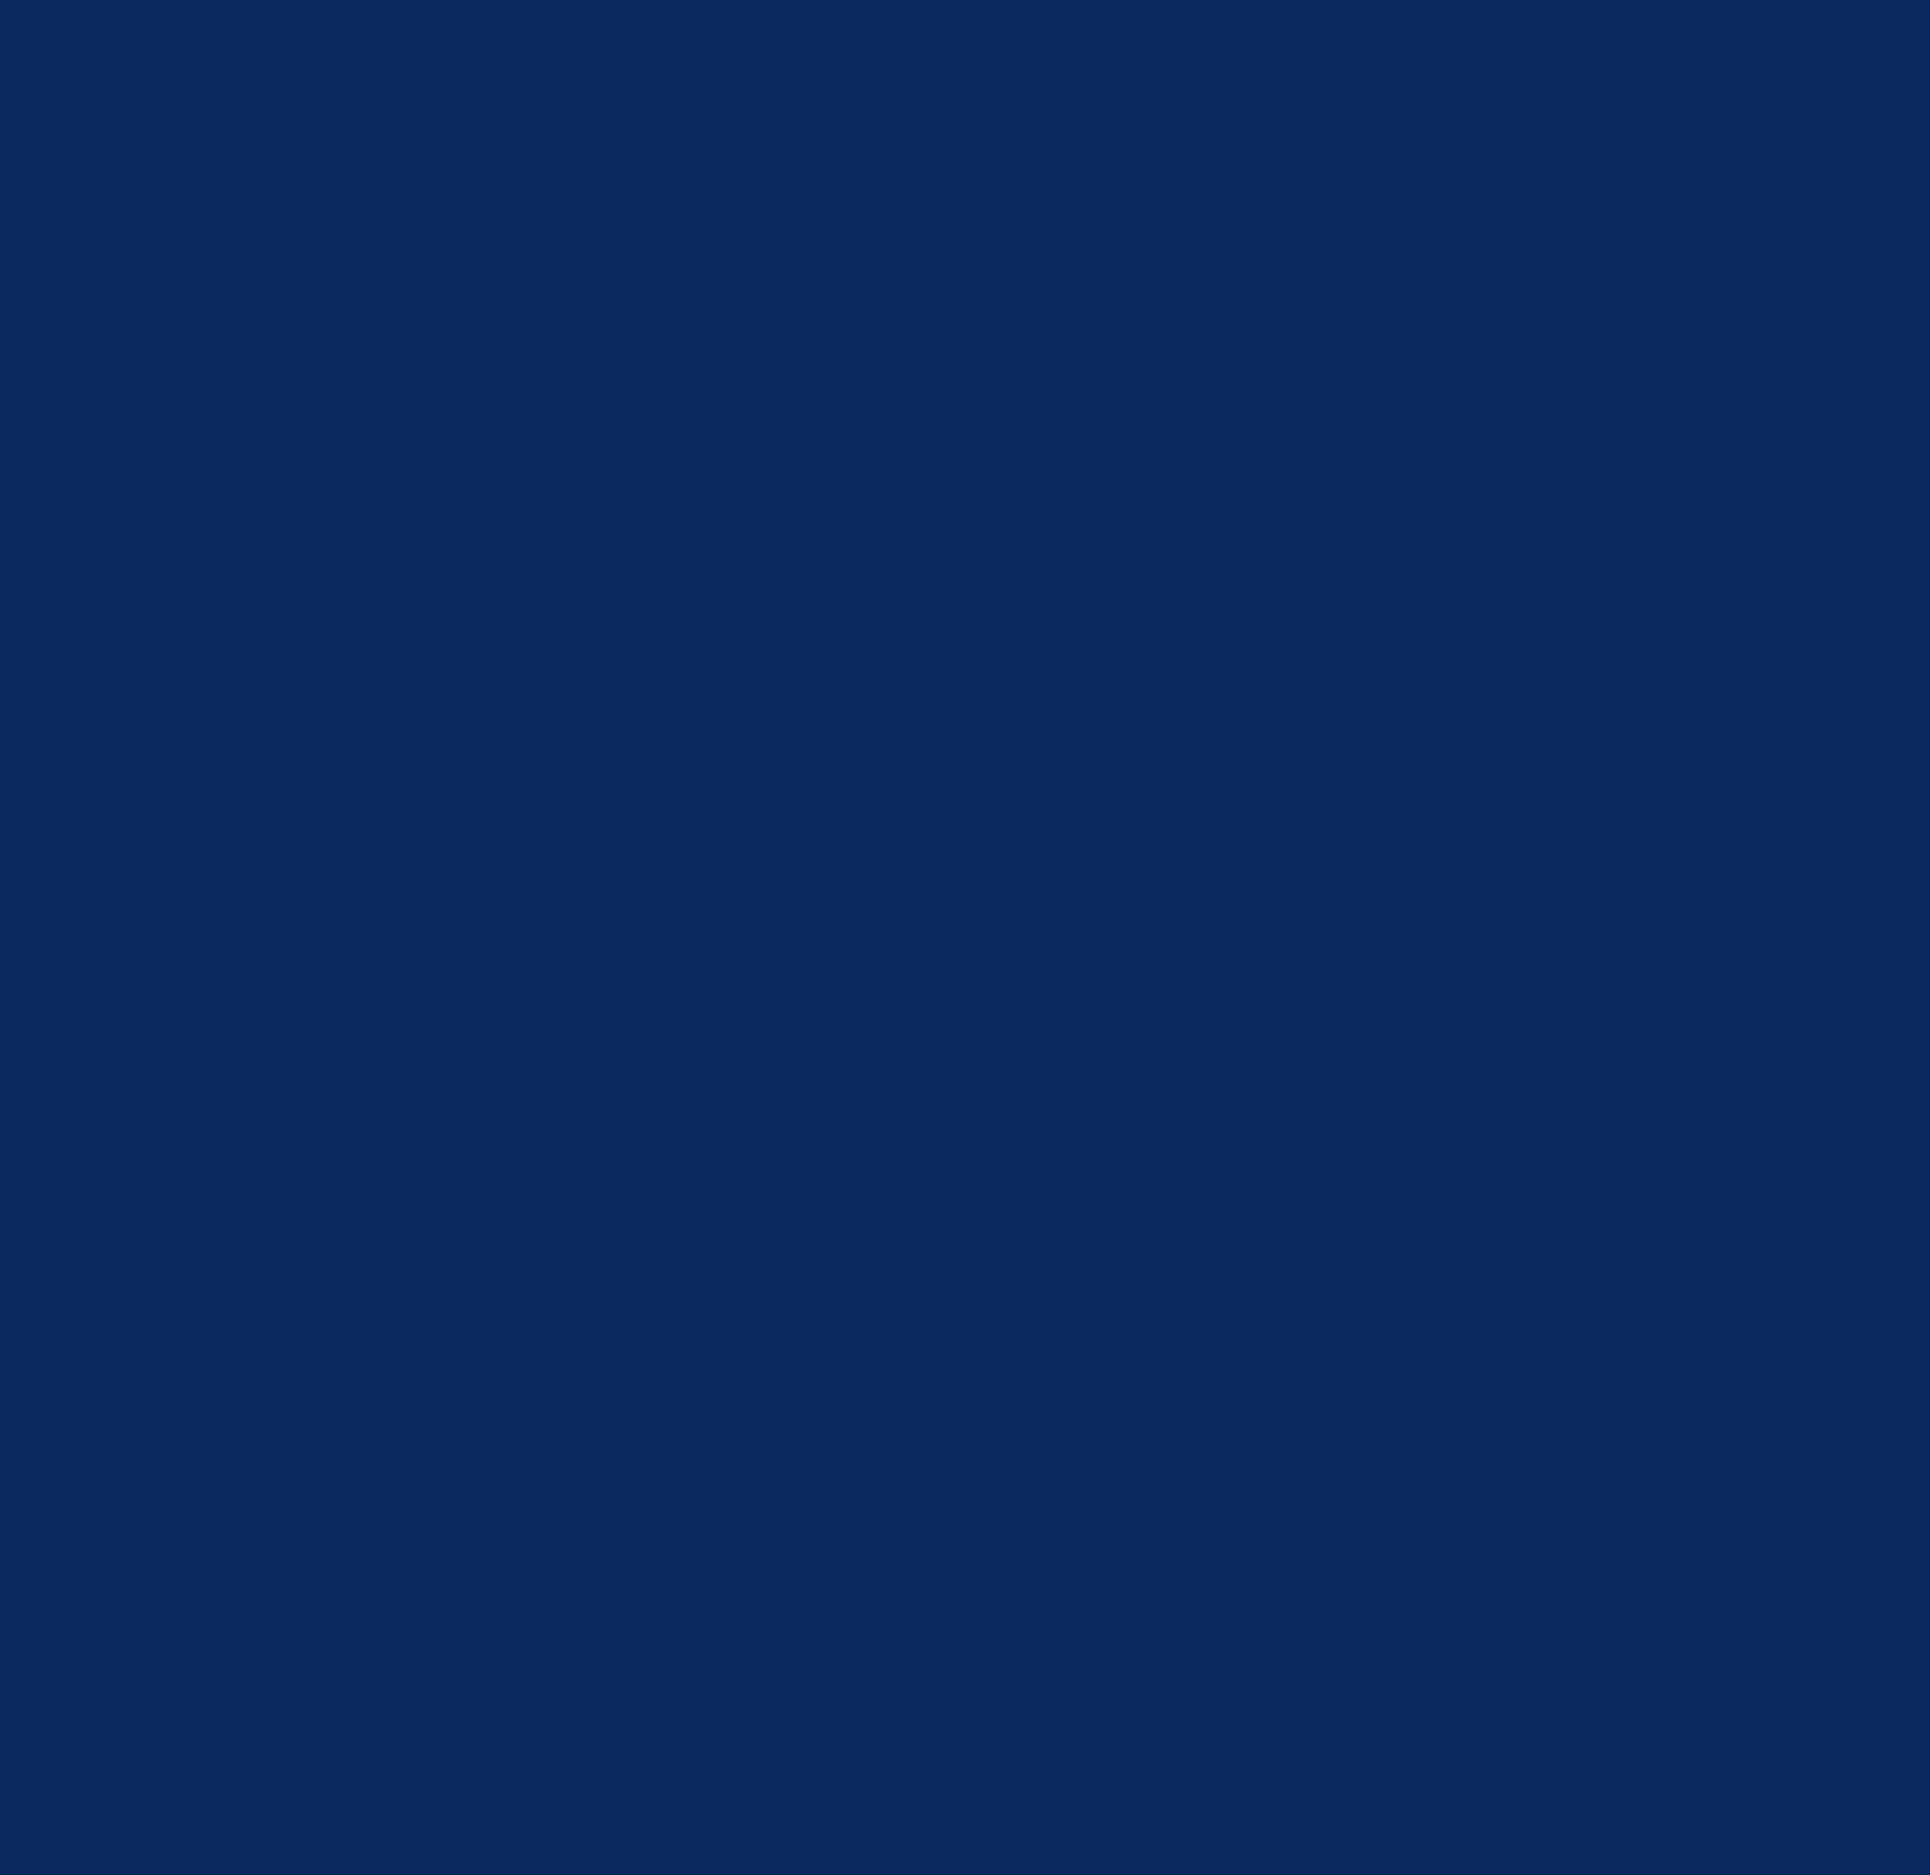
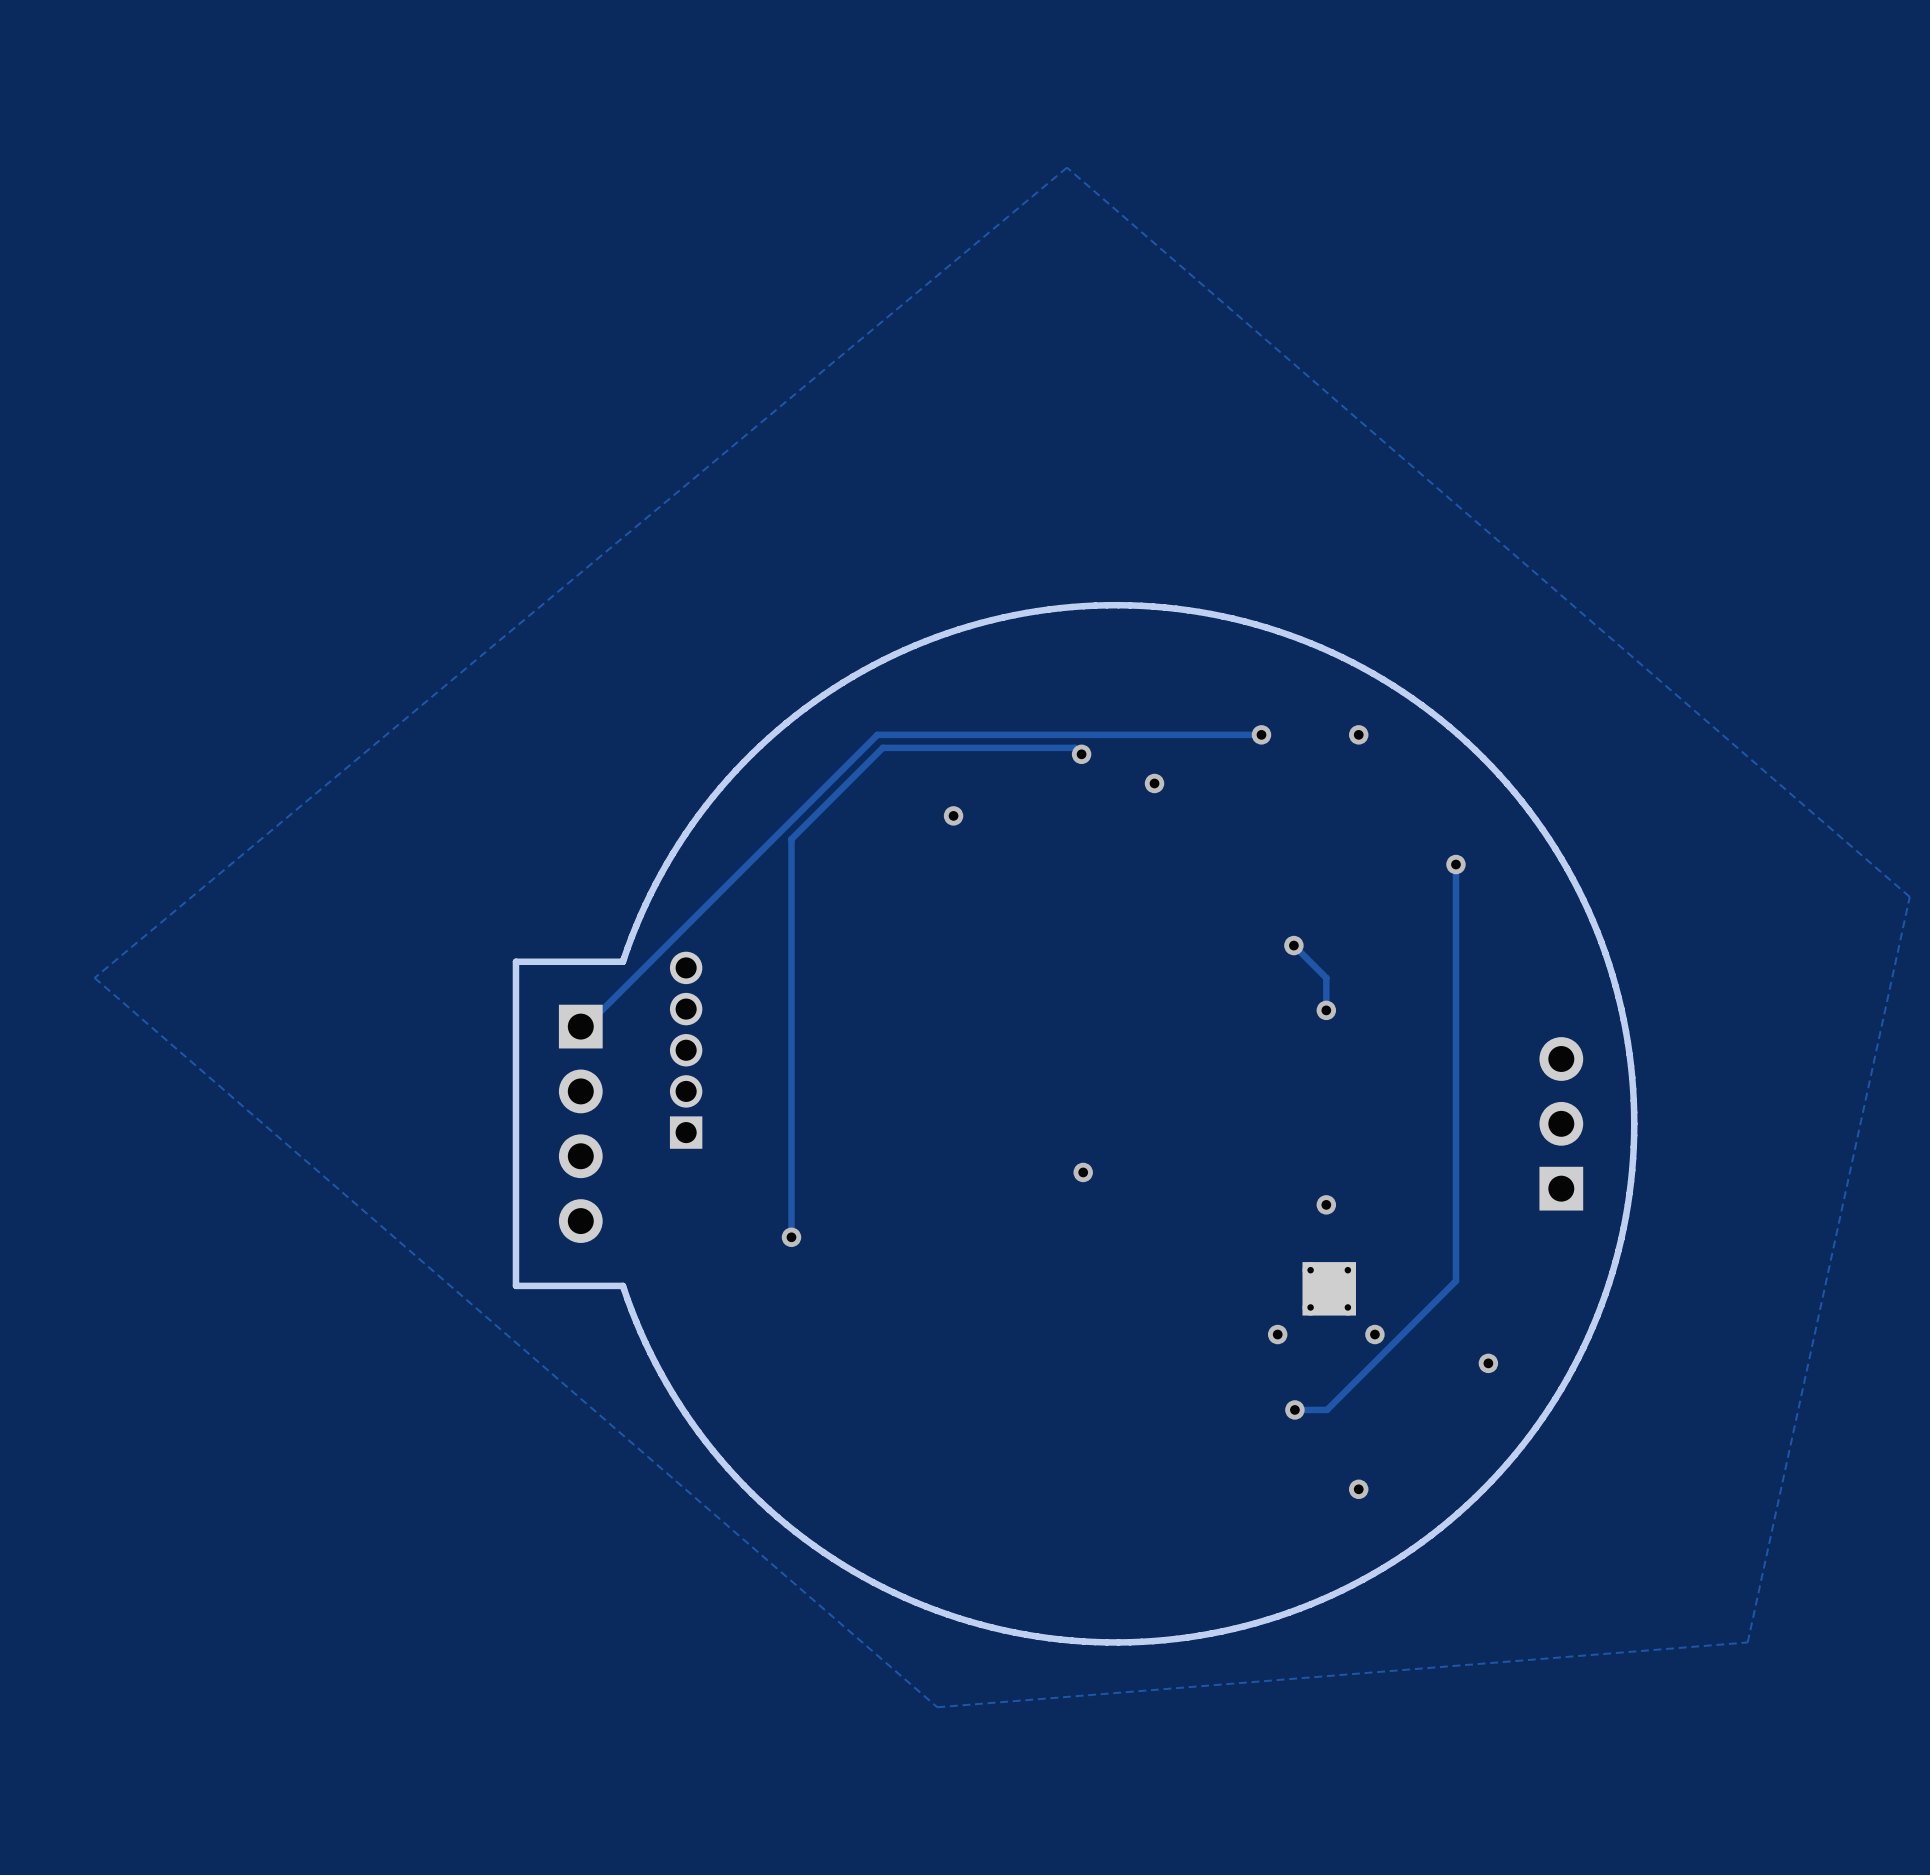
zone outline: none -> (1067, 167) (1909, 896) (1747, 1642) (937, 1707) (94, 977) (1067, 167)
board edge: none -> (1118, 605) (1164, 607) (1222, 616) (1267, 627) (1310, 643) (1363, 668) (1402, 691) (1449, 726) (1483, 758) (1521, 801) (1549, 839) (1572, 878) (1597, 931) (1612, 975) (1623, 1020) (1632, 1077) (1634, 1123) (1632, 1170) (1623, 1227) (1612, 1272) (1597, 1316) (1572, 1368) (1549, 1408) (1521, 1446) (1483, 1489) (1449, 1520) (1402, 1555) (1363, 1579) (1310, 1604) (1267, 1619) (1222, 1631) (1164, 1640) (1118, 1642) (1049, 1638) (980, 1624) (915, 1602) (852, 1571) (814, 1545) (777, 1517) (743, 1485) (712, 1450) (685, 1413) (661, 1373) (640, 1332) (622, 1285) (515, 1285) (515, 961) (622, 961) (640, 915) (661, 873) (685, 834) (712, 796) (743, 762) (777, 730) (814, 701) (852, 676) (915, 645) (980, 622) (1049, 609) (1118, 605)
track: none -> (1261, 734) (877, 734) (585, 1026) (580, 1026)
via: none -> (1261, 734)
via: none -> (1358, 734)
track: none -> (1081, 754) (1075, 747) (882, 747) (791, 839) (791, 1237)
via: none -> (1081, 754)
via: none -> (1154, 783)
via: none -> (953, 815)
track: none -> (1455, 864) (1455, 1281) (1327, 1409) (1294, 1409)
via: none -> (1455, 864)
track: none -> (1293, 945) (1326, 977) (1326, 1010)
via: none -> (1293, 945)
via: none -> (1326, 1010)
part: none -> (686, 1050)
part: none -> (580, 1123)
part: none -> (1561, 1123)
via: none -> (1083, 1172)
via: none -> (1326, 1204)
via: none -> (791, 1237)
part: none -> (1329, 1288)
via: none -> (1277, 1334)
via: none -> (1374, 1334)
via: none -> (1488, 1363)
via: none -> (1294, 1409)
via: none -> (1358, 1489)

